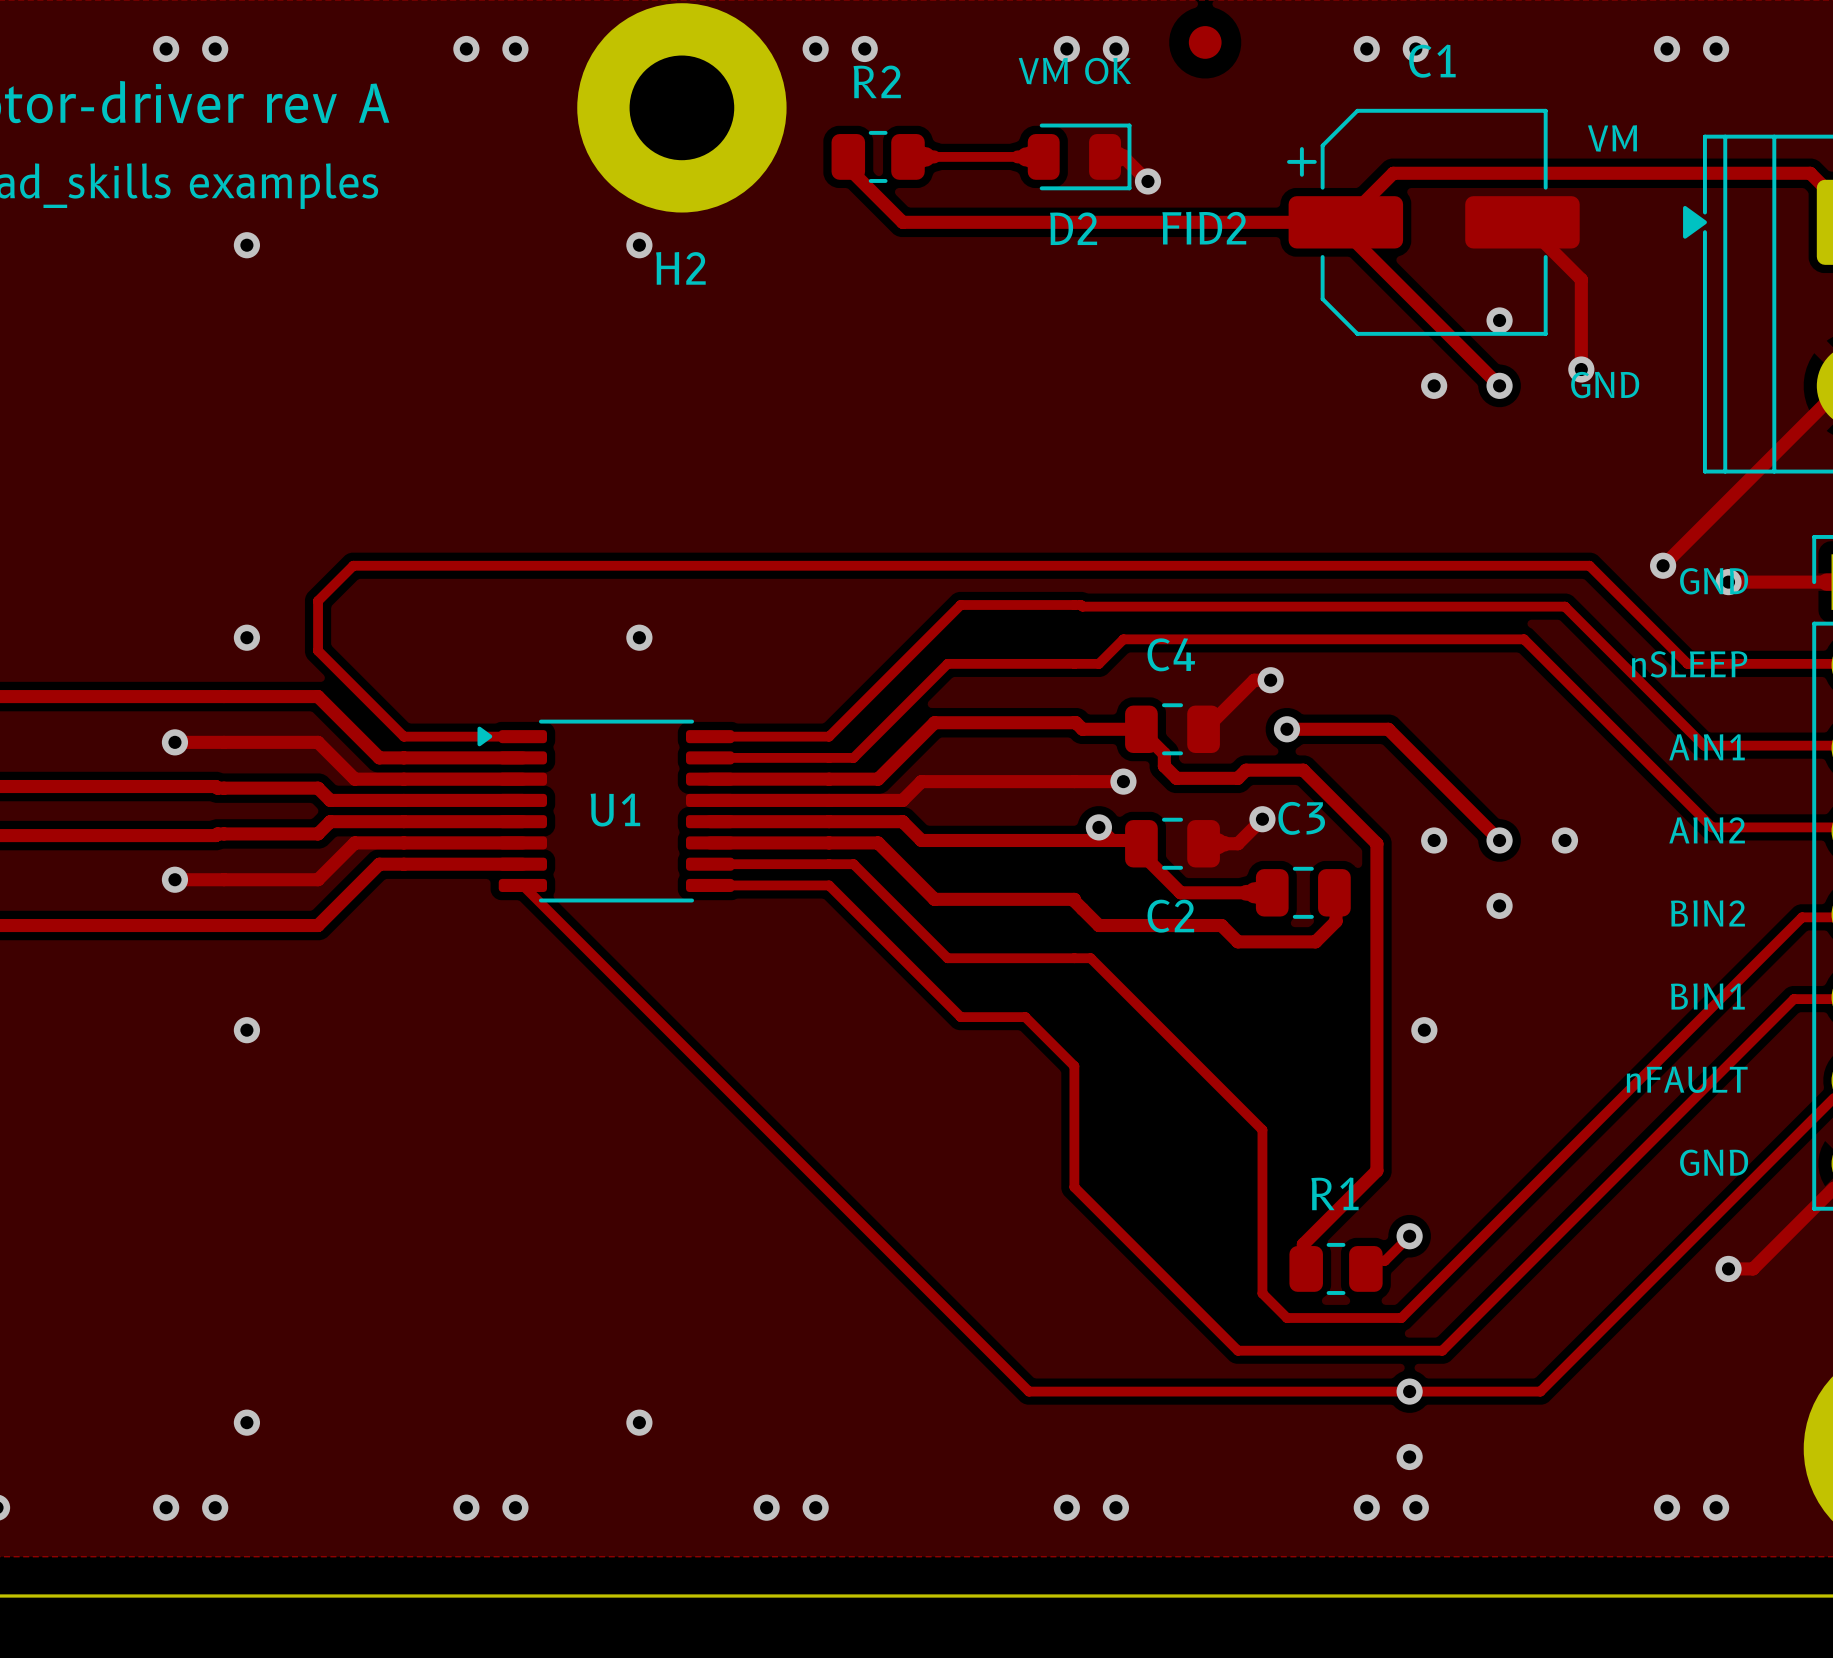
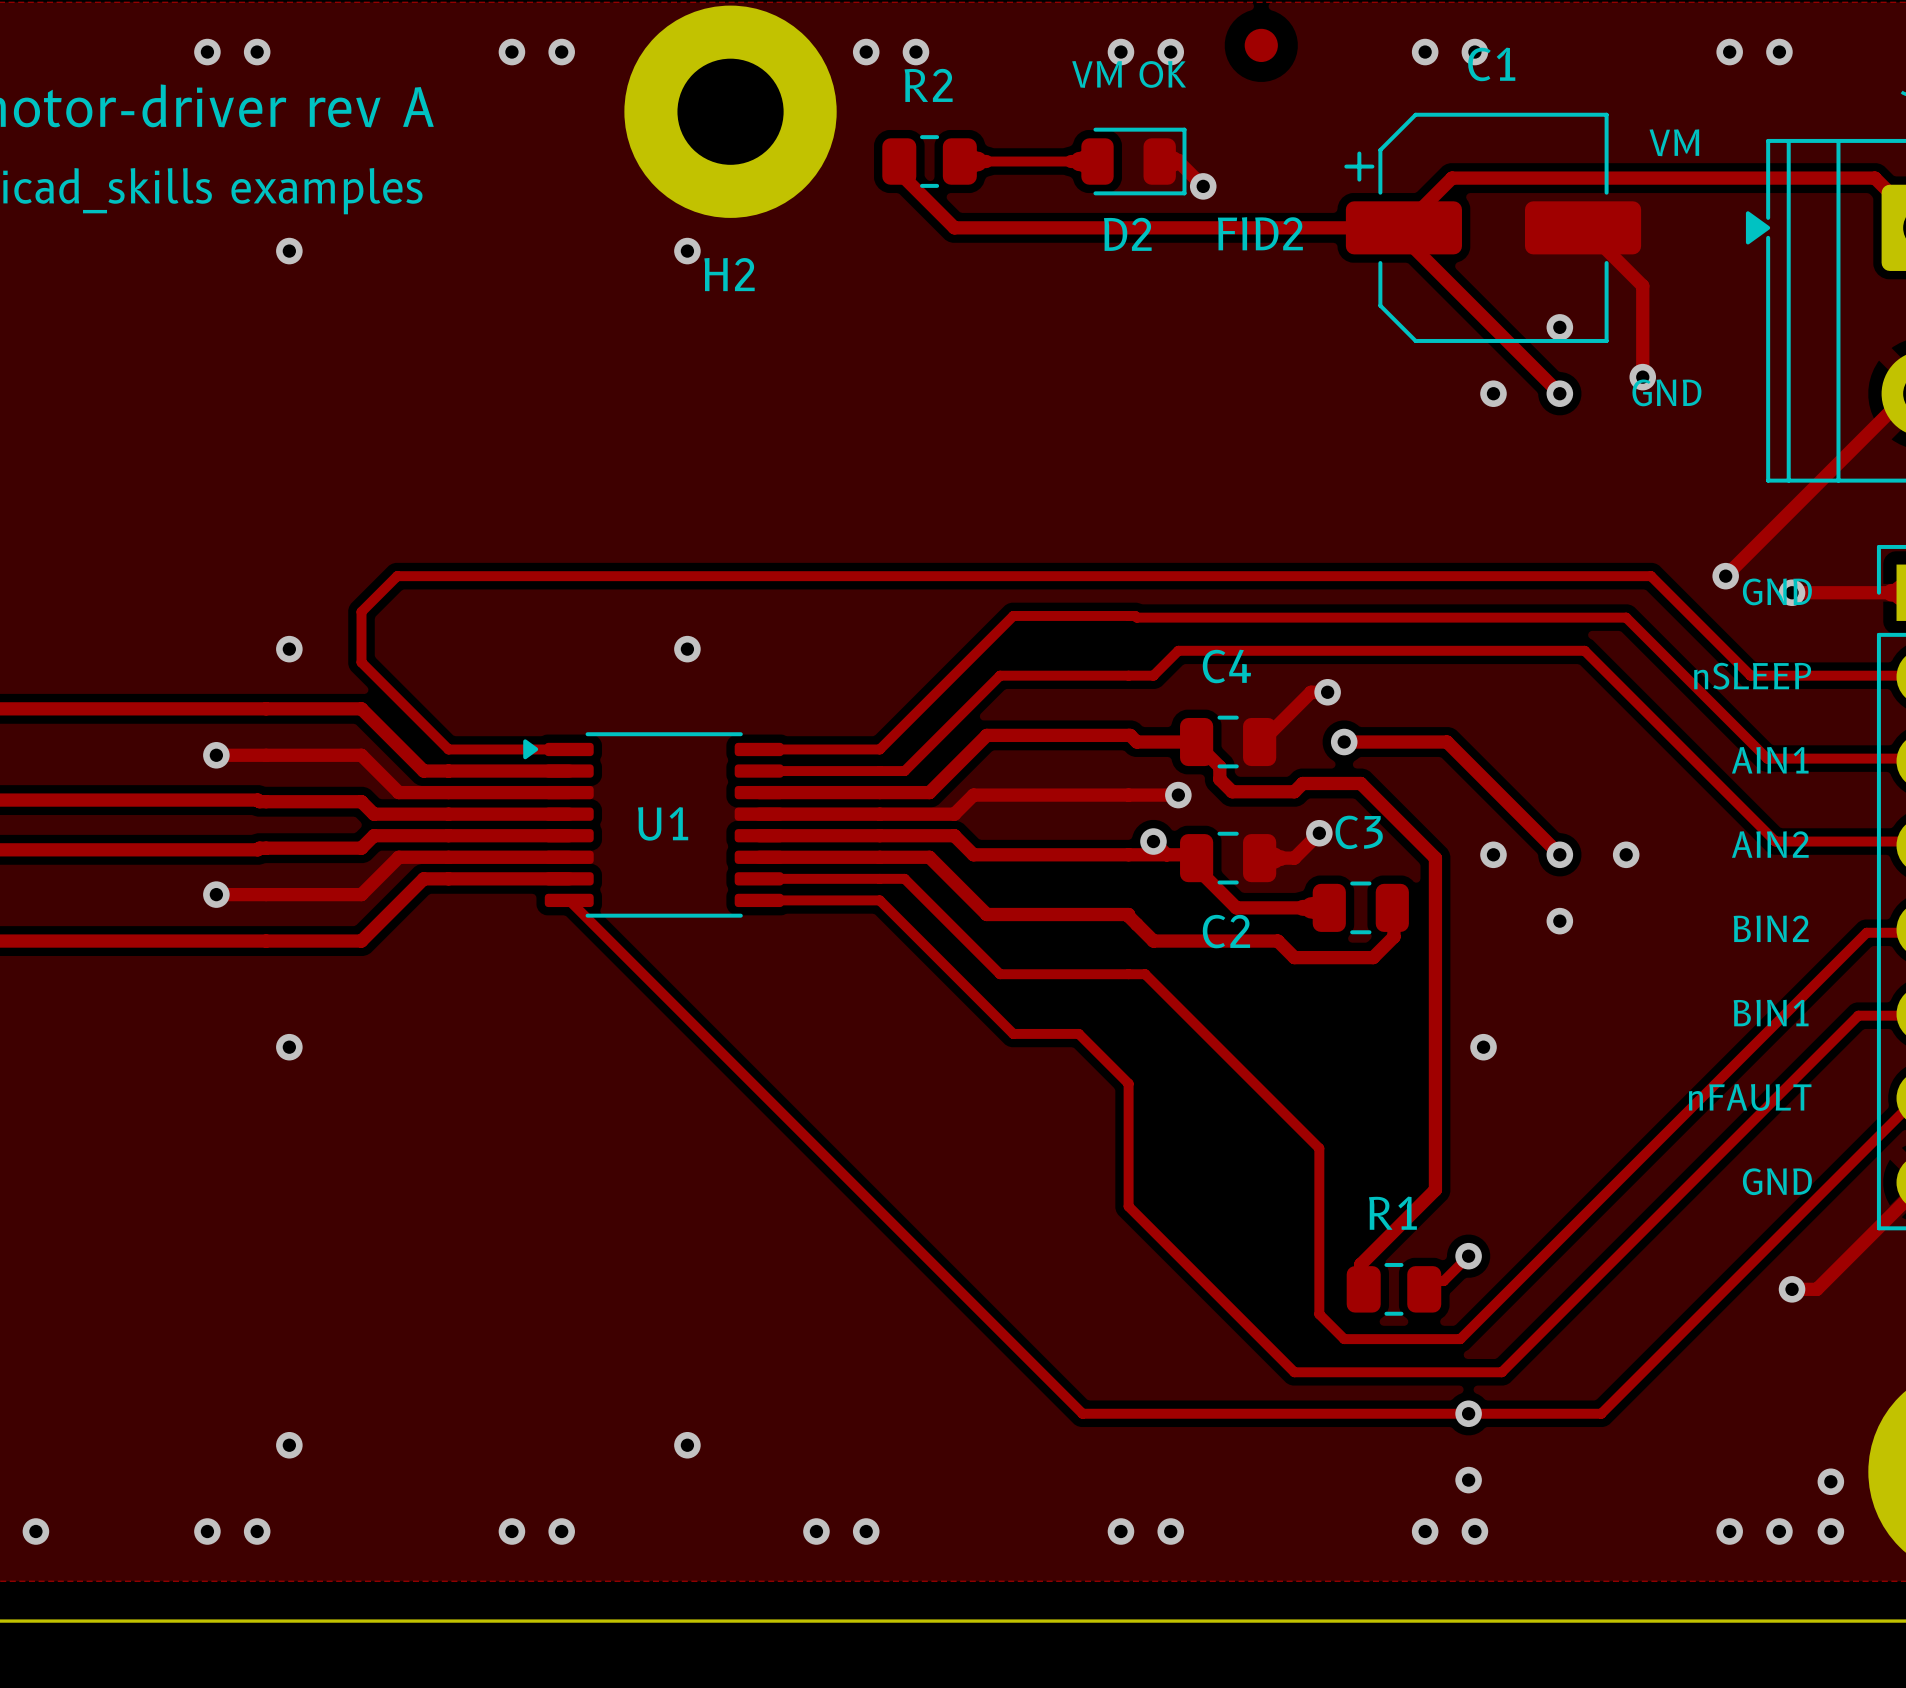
via: none -> (1830, 1481)
via: none -> (1830, 1531)

